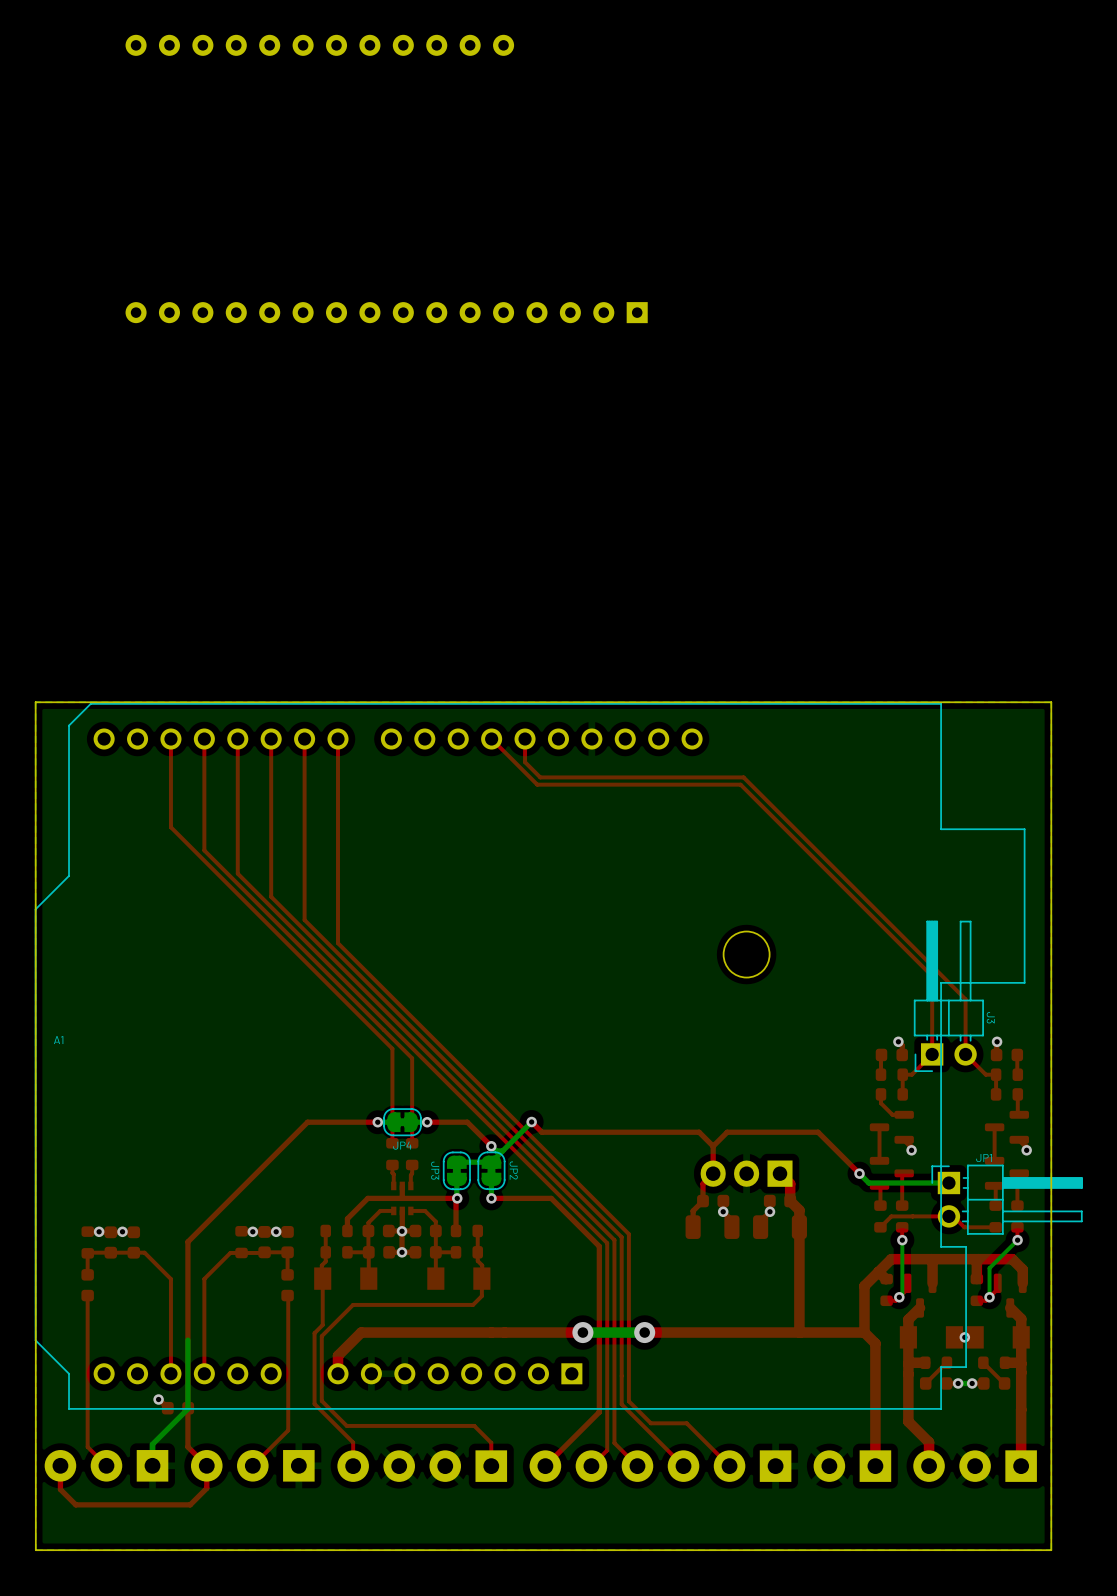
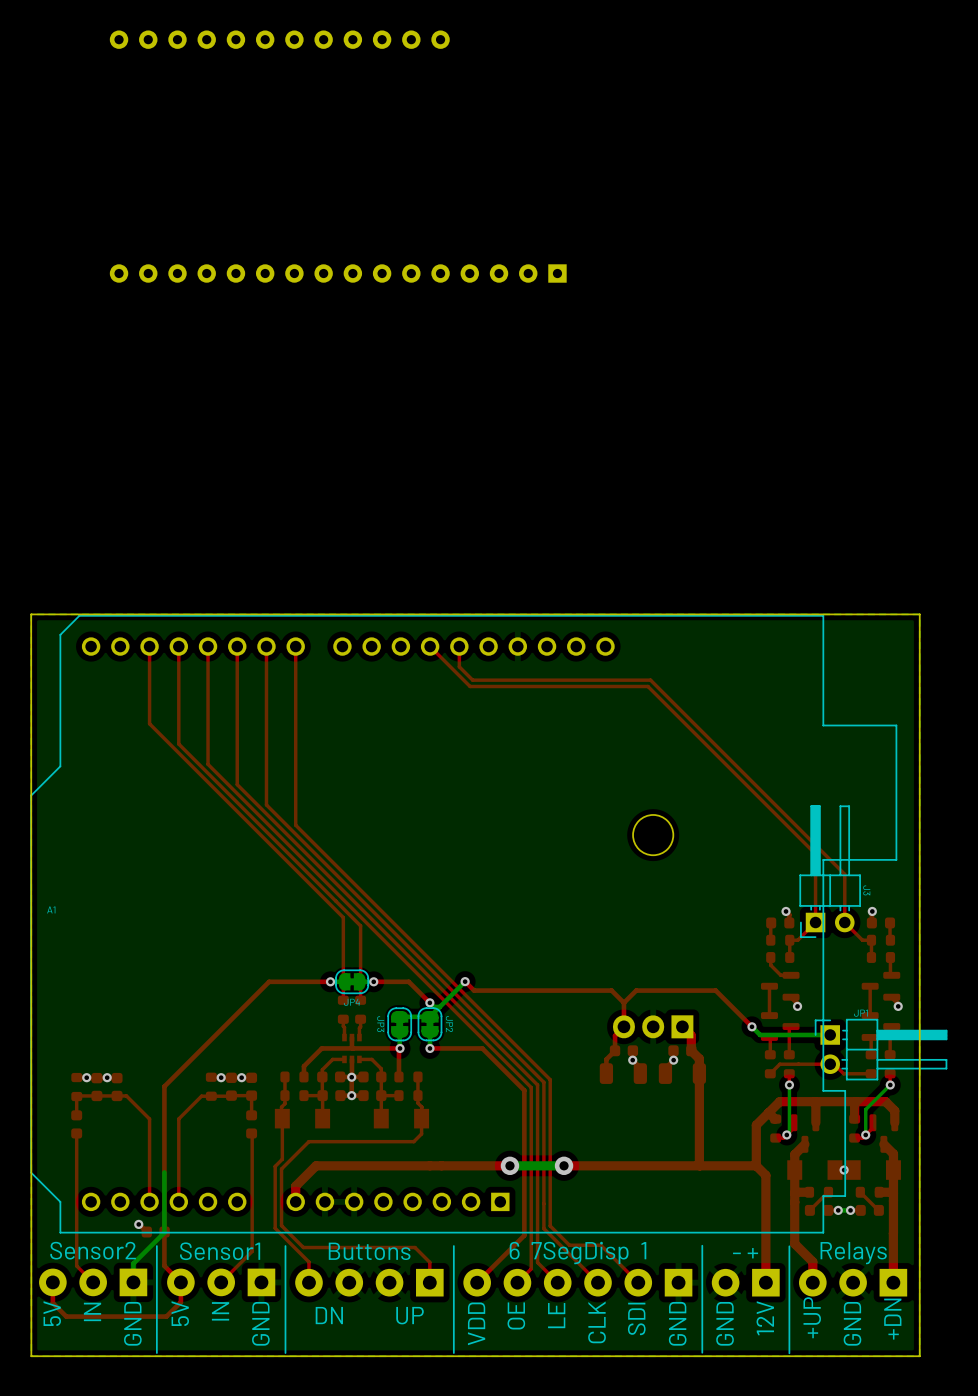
line: none -> (702, 1245) (702, 1352)
line: none -> (156, 1246) (156, 1353)
line: none -> (285, 1246) (285, 1353)
line: none -> (453, 1246) (453, 1353)
line: none -> (789, 1246) (789, 1353)
text: none -> Sensor2 (93, 1250)
text: none -> Sensor1 (220, 1251)
text: none -> Buttons (369, 1251)
text: none -> 6 7SegDisp 1 (578, 1252)
text: none -> - + (745, 1253)
text: none -> Relays (853, 1253)
text: none -> IN (220, 1311)
text: none -> IN (92, 1311)
text: none -> 5V (52, 1313)
text: none -> 5V (180, 1313)
text: none -> DN (329, 1315)
text: none -> UP (410, 1315)
text: none -> LE (556, 1315)
text: none -> OE (516, 1315)
text: none -> 12V (765, 1318)
text: none -> +UP (812, 1317)
text: none -> SDI (636, 1318)
text: none -> +DN (892, 1319)
text: none -> CLK (597, 1322)
text: none -> GND (132, 1323)
text: none -> GND (260, 1323)
text: none -> VDD (476, 1323)
text: none -> GND (677, 1323)
text: none -> GND (725, 1323)
text: none -> GND (852, 1323)

